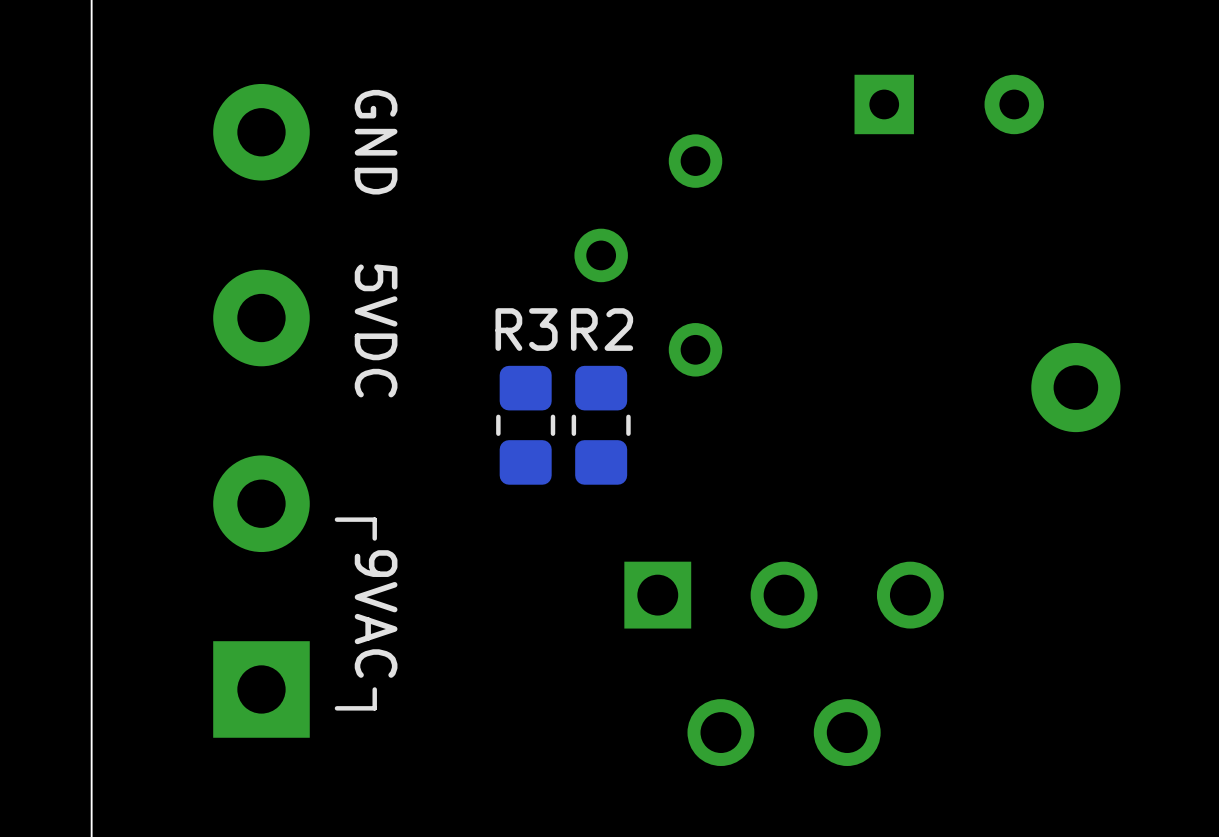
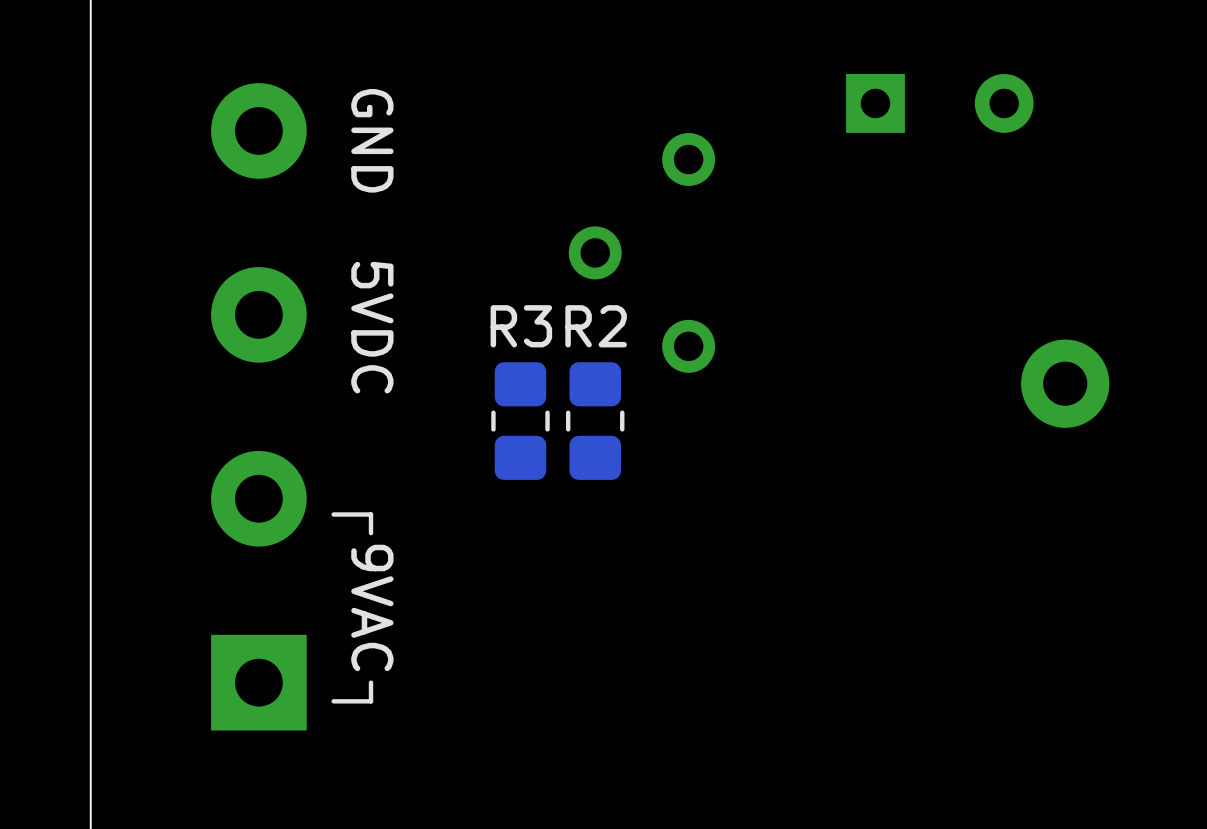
part: (784, 663) -> none

